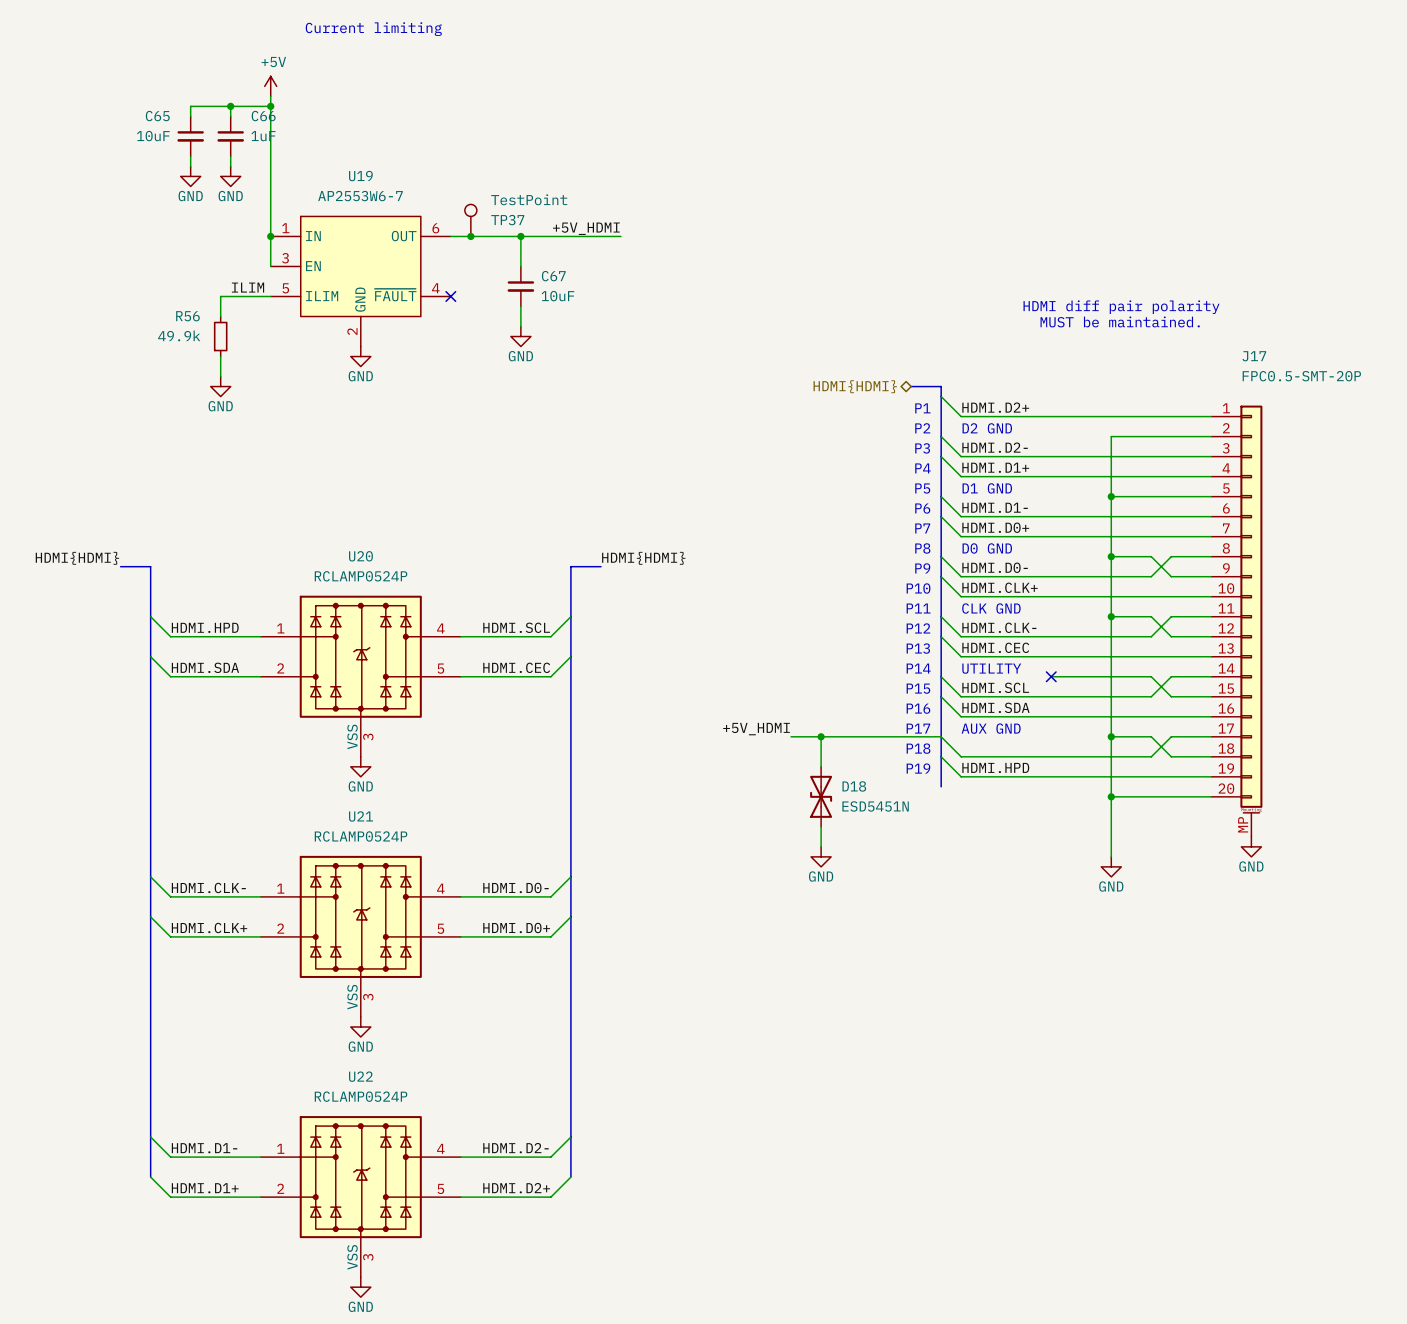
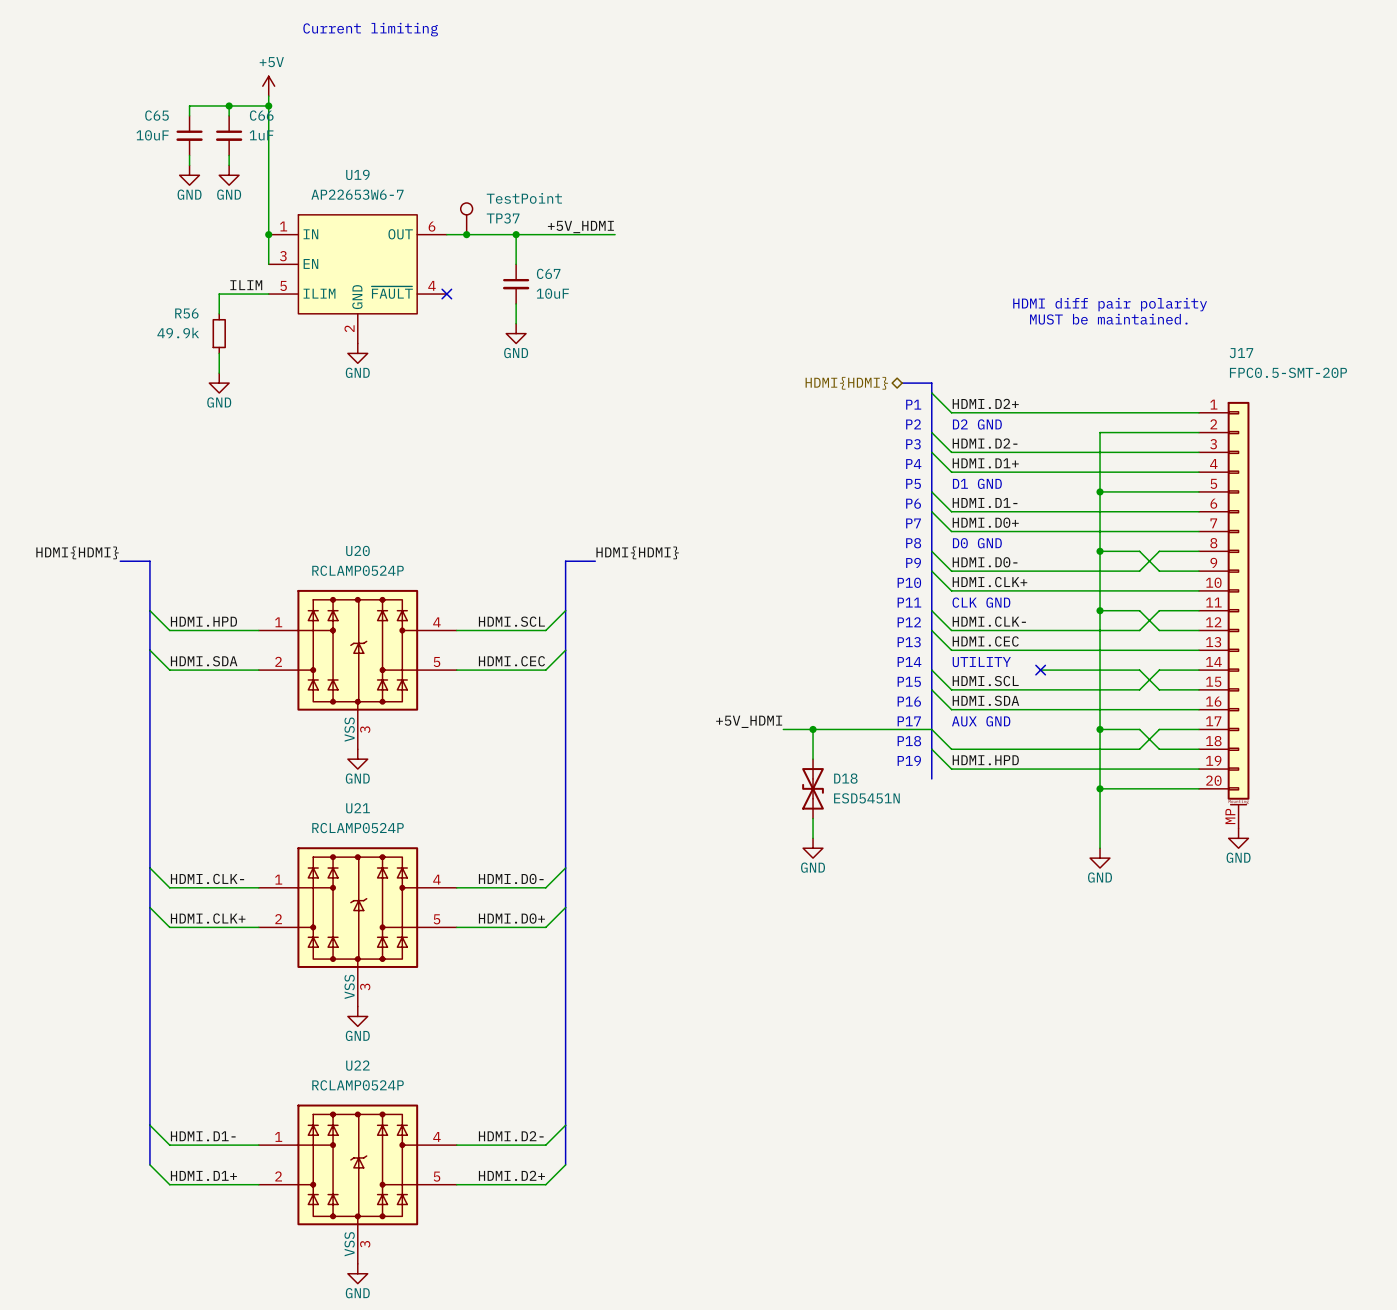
U19 value: AP2553W6-7 (360, 196) -> AP22653W6-7 (357, 194)

